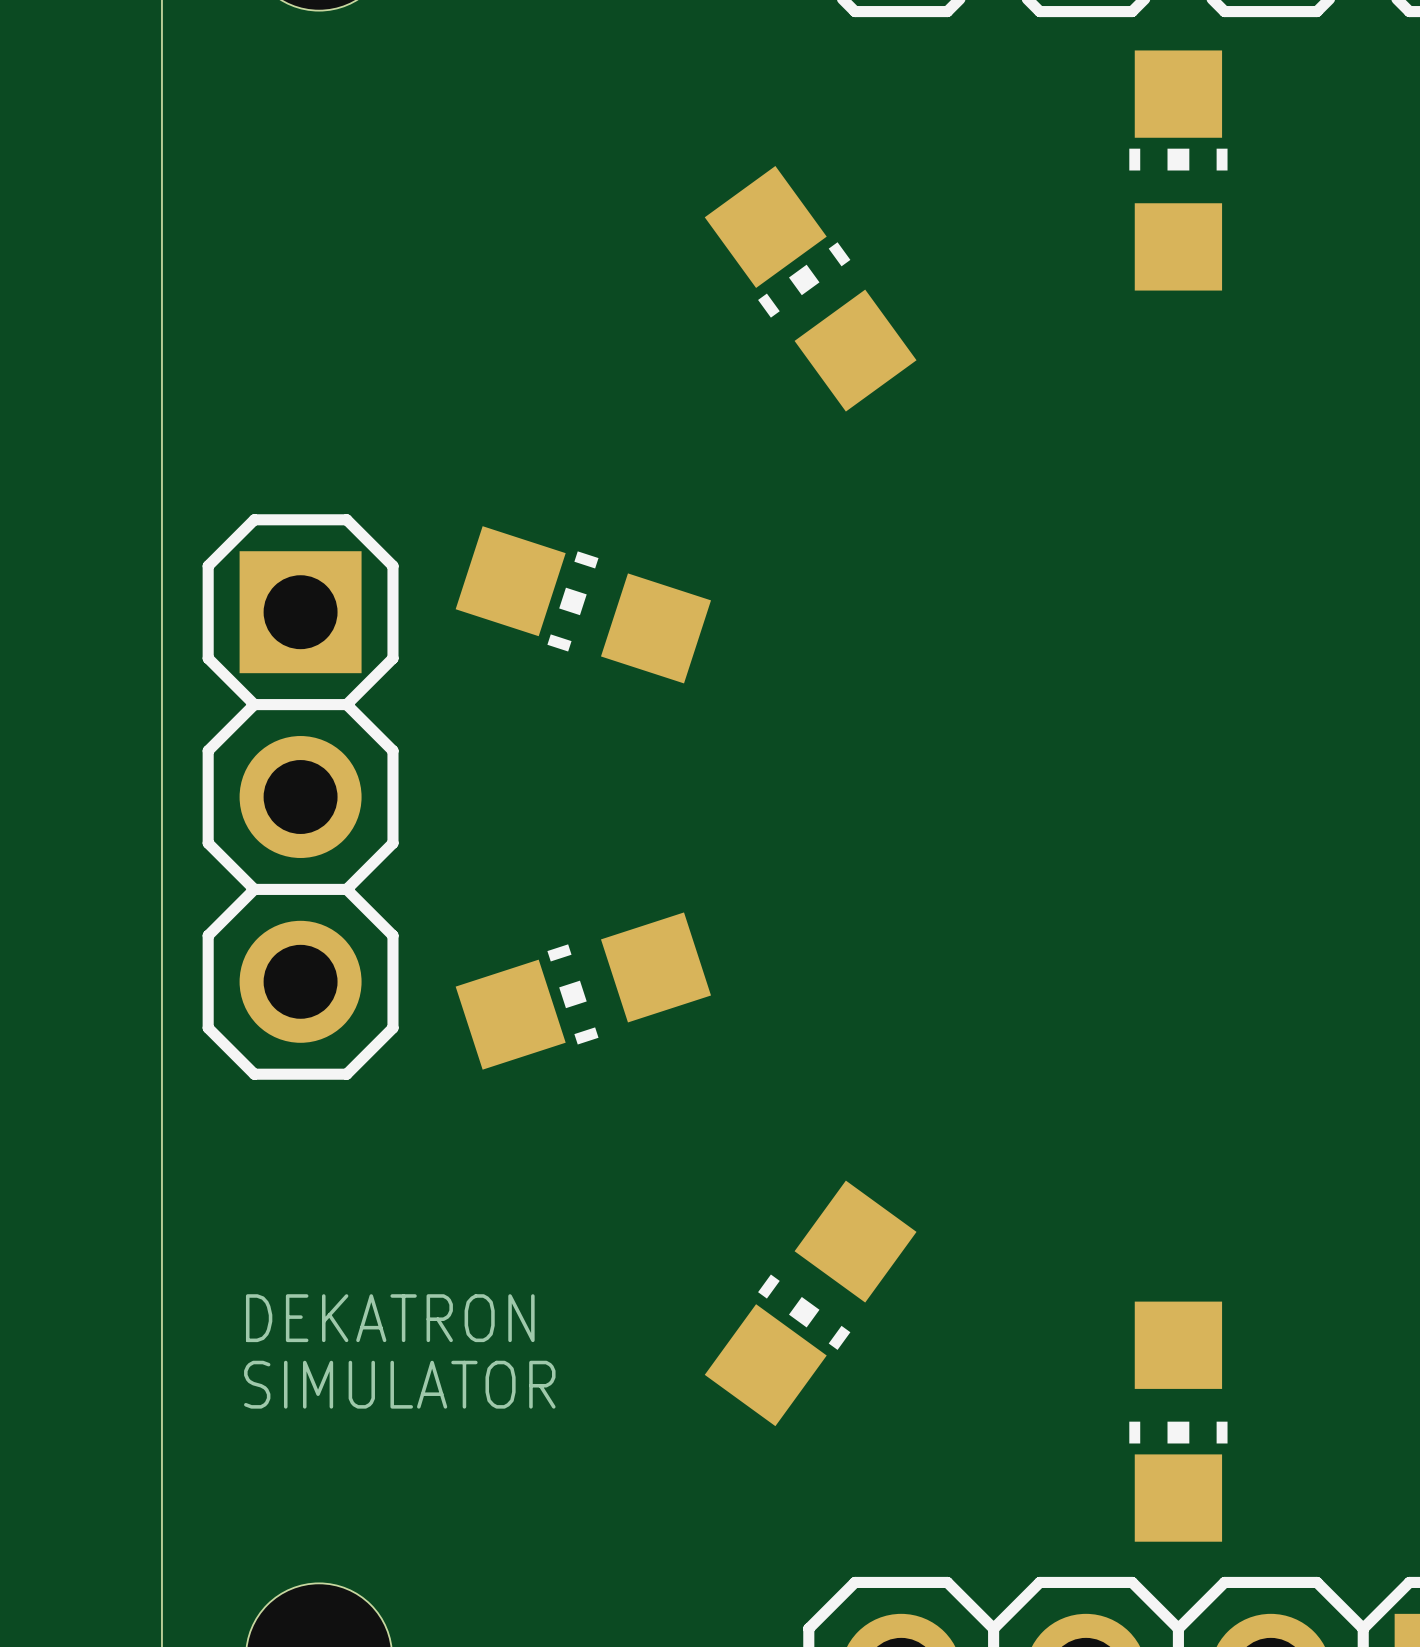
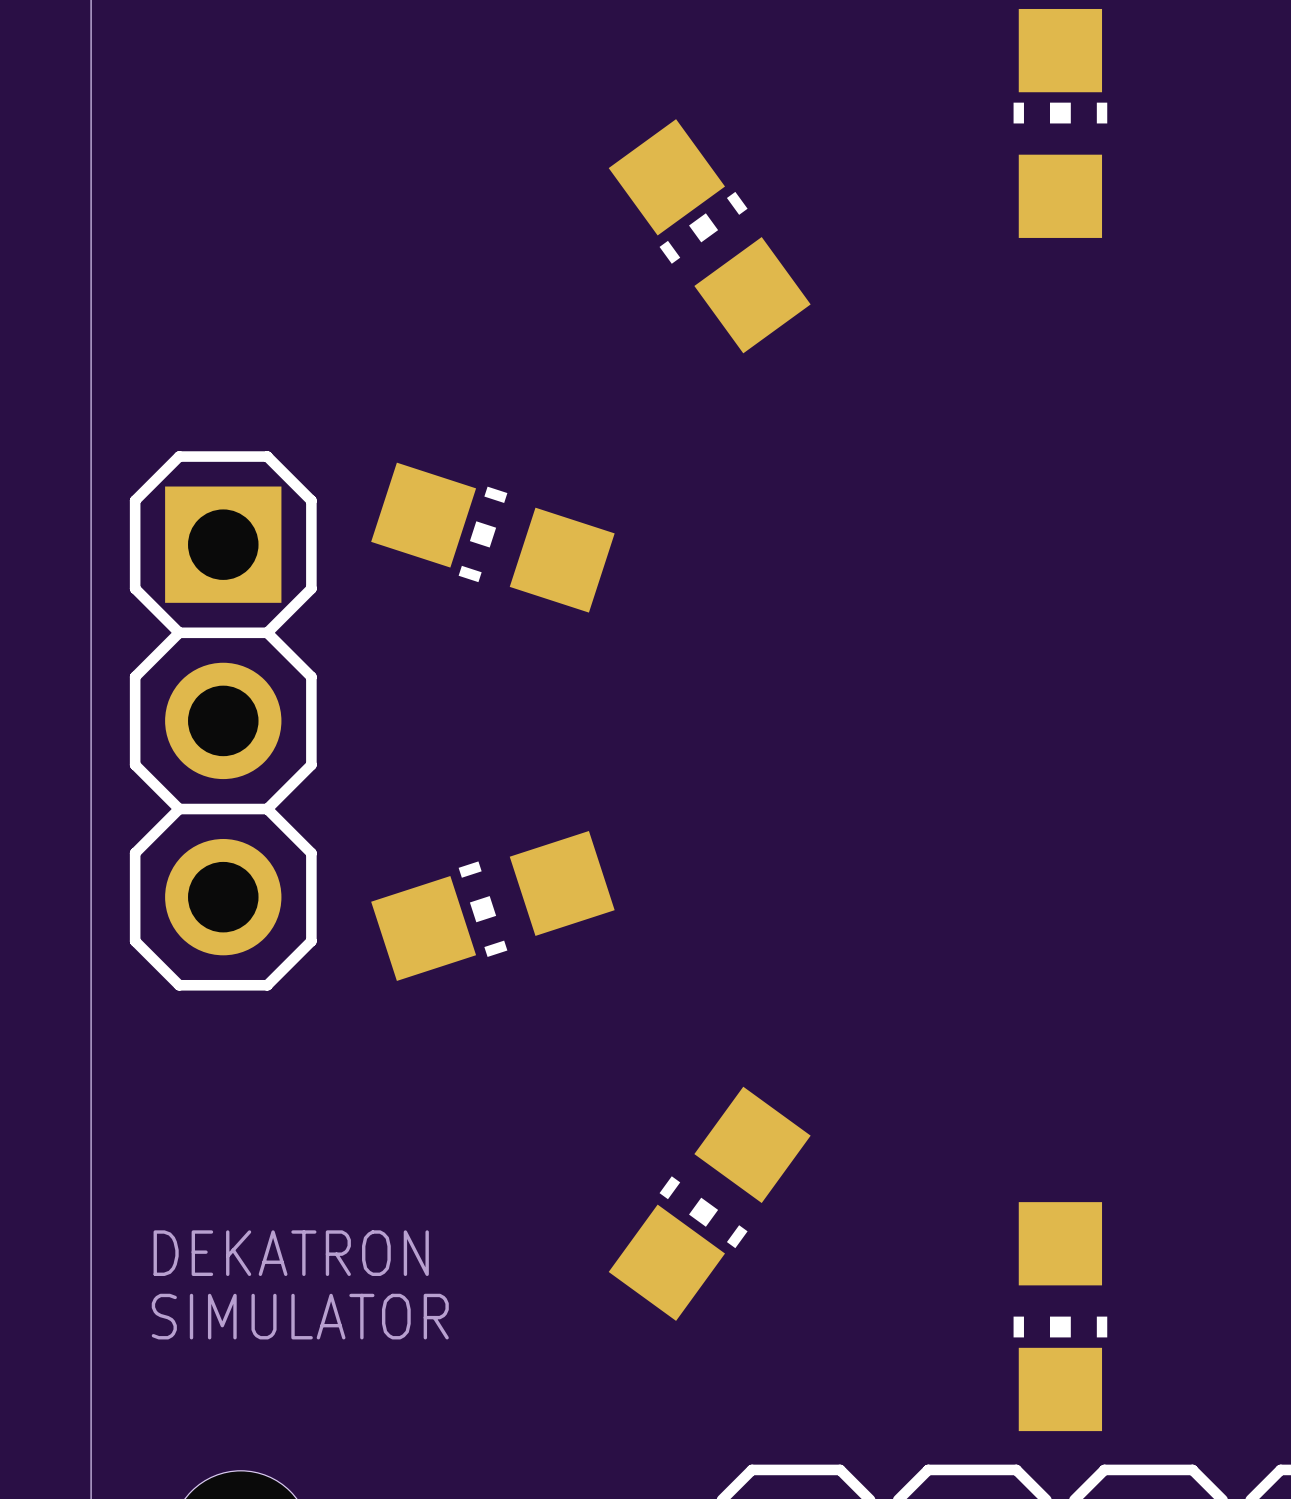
text position: DEKATRON (390, 1318) -> DEKATRON (291, 1253)
text position: SIMULATOR (399, 1384) -> SIMULATOR (300, 1316)

